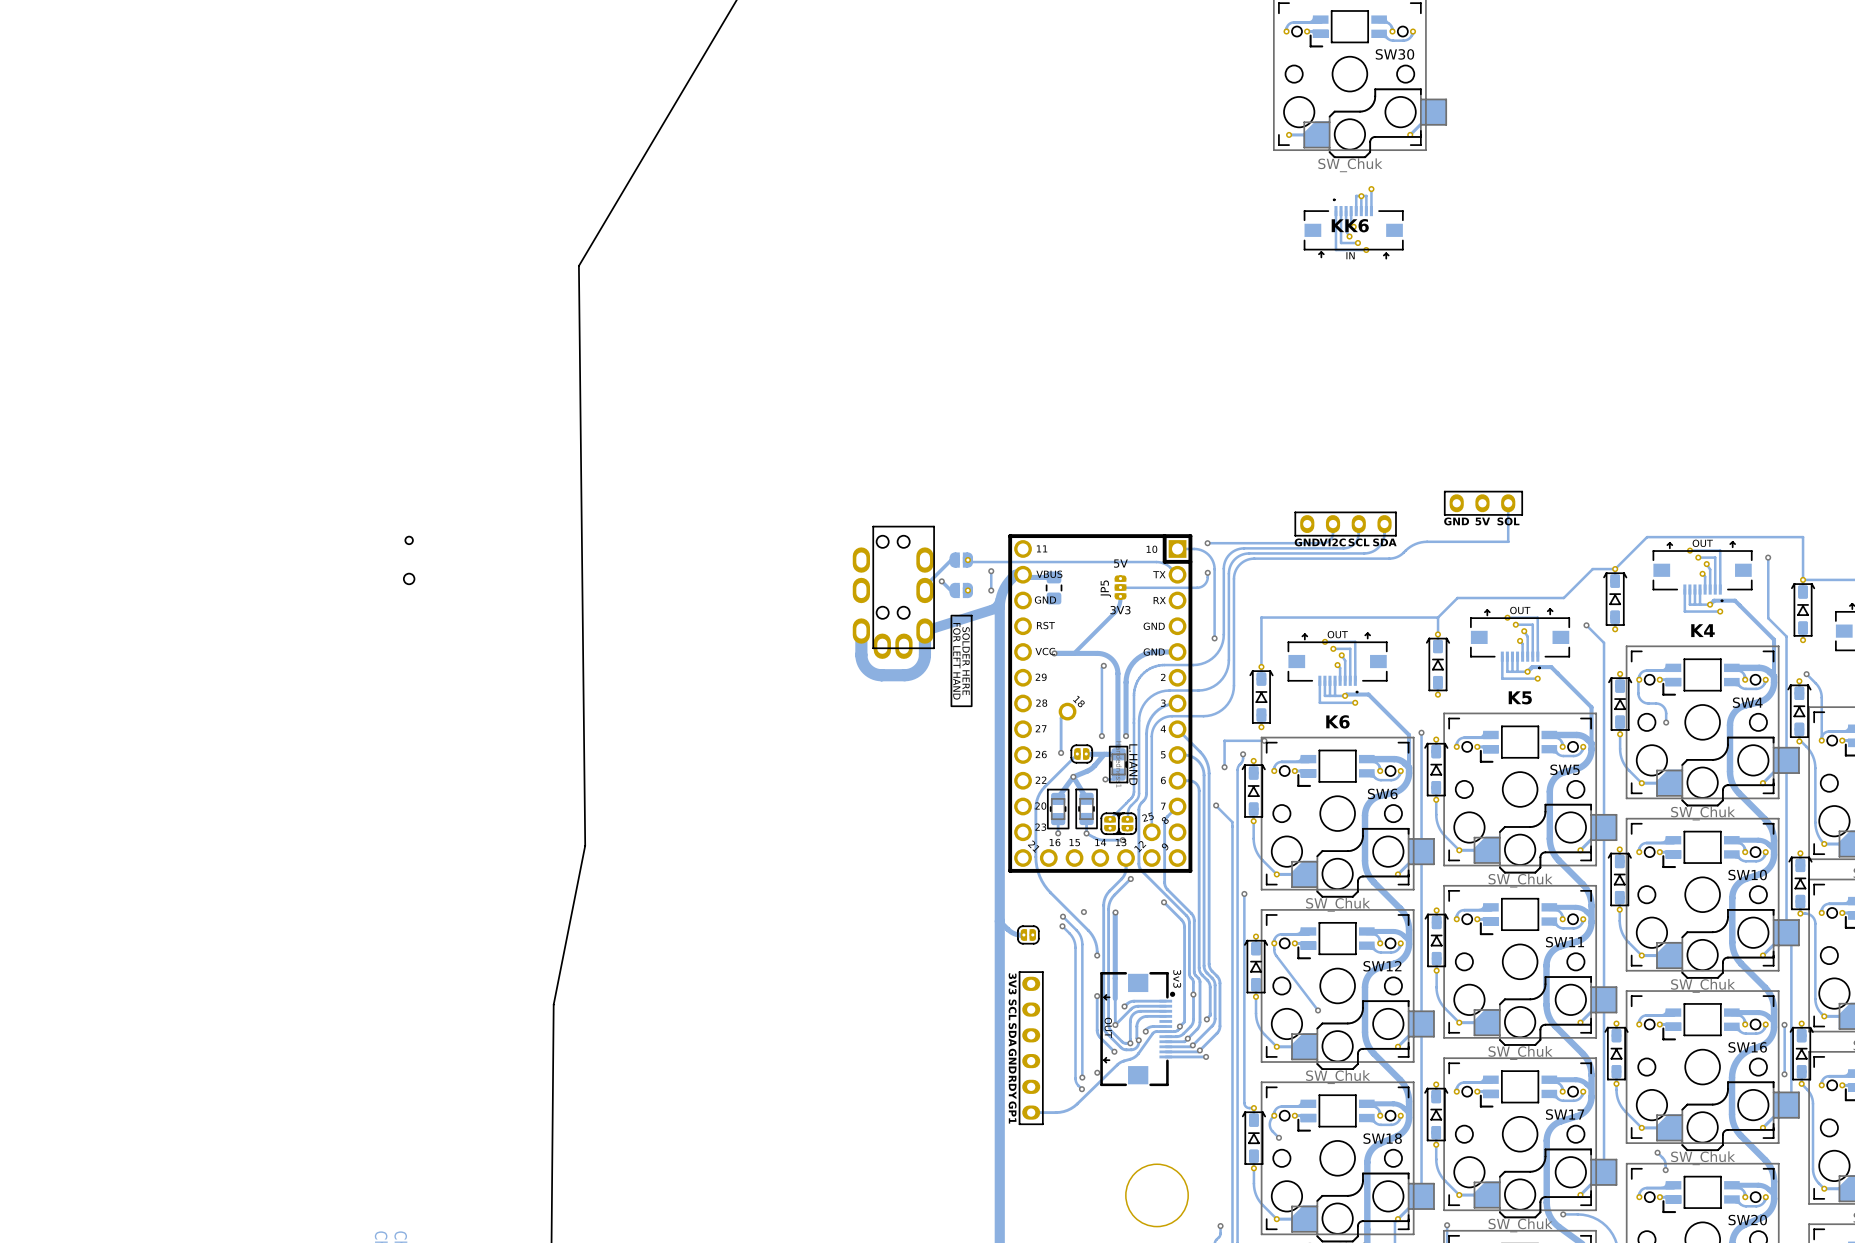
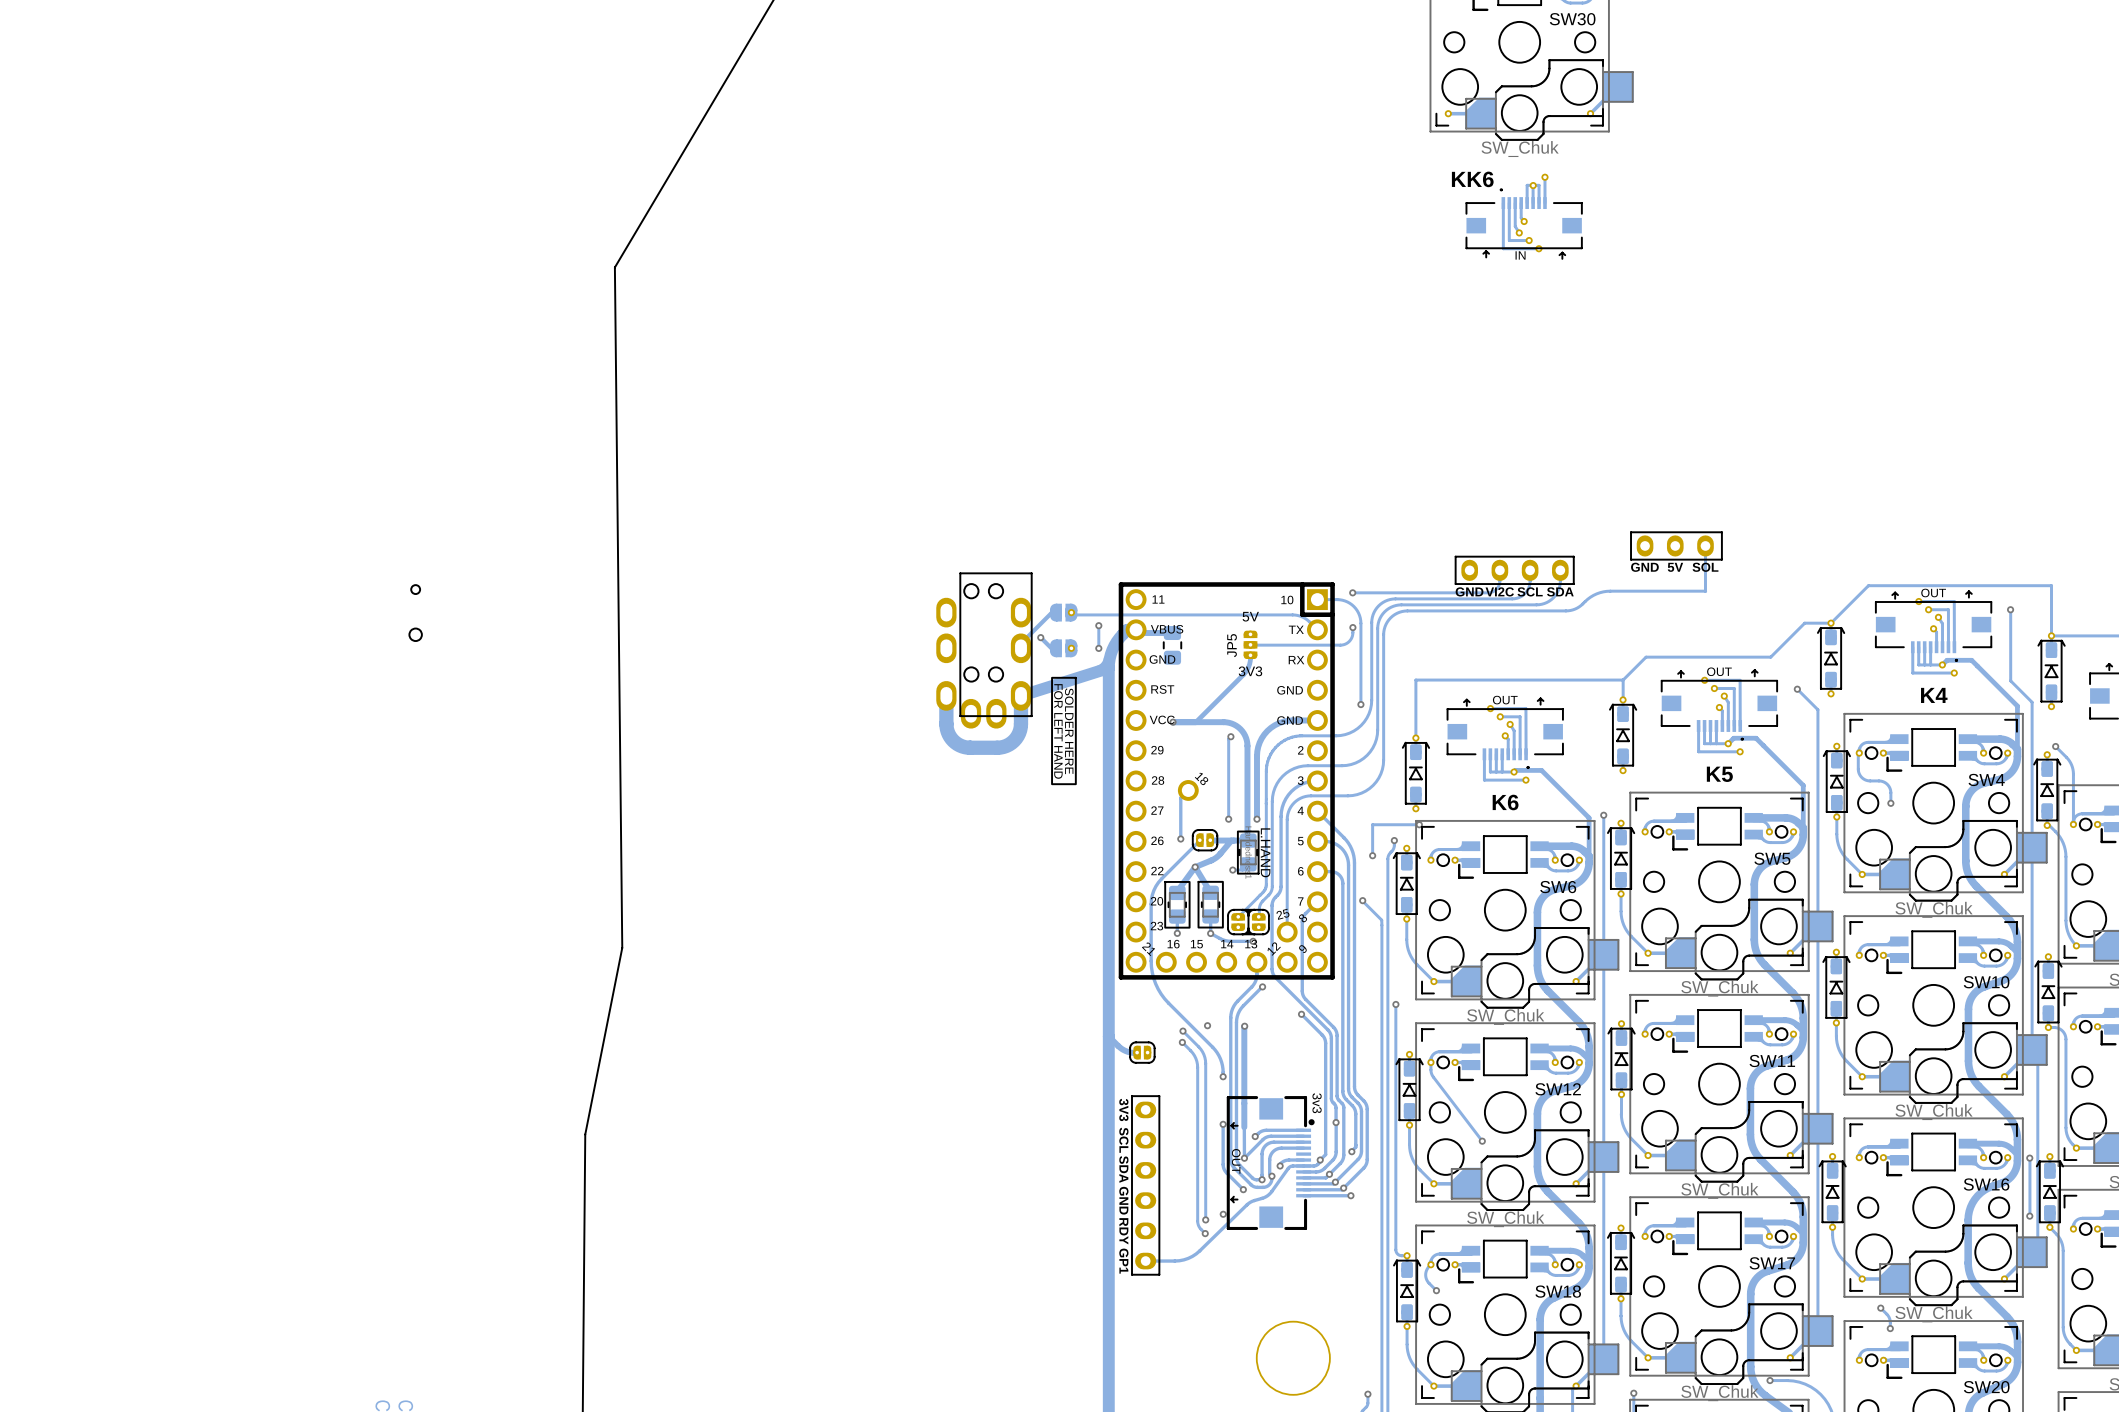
KK6 name position: KK6 (1350, 225) -> KK6 (1472, 179)

